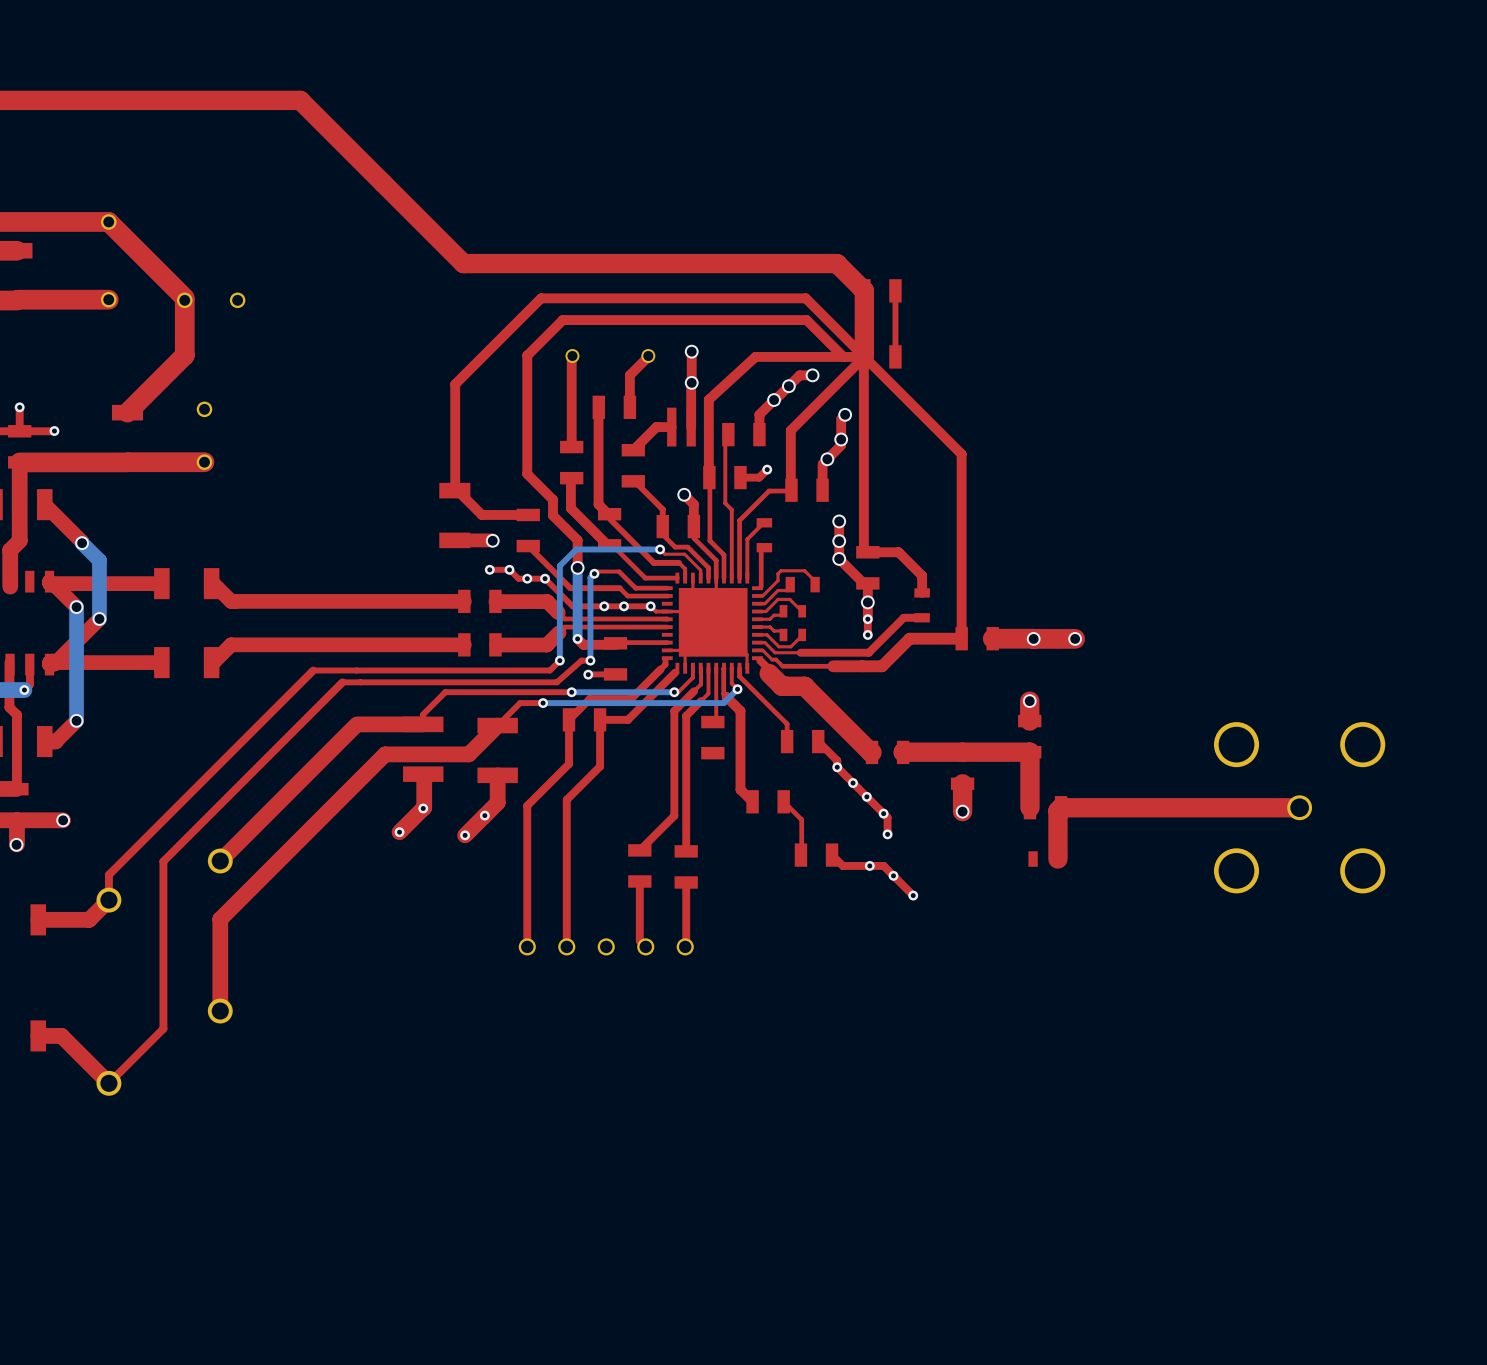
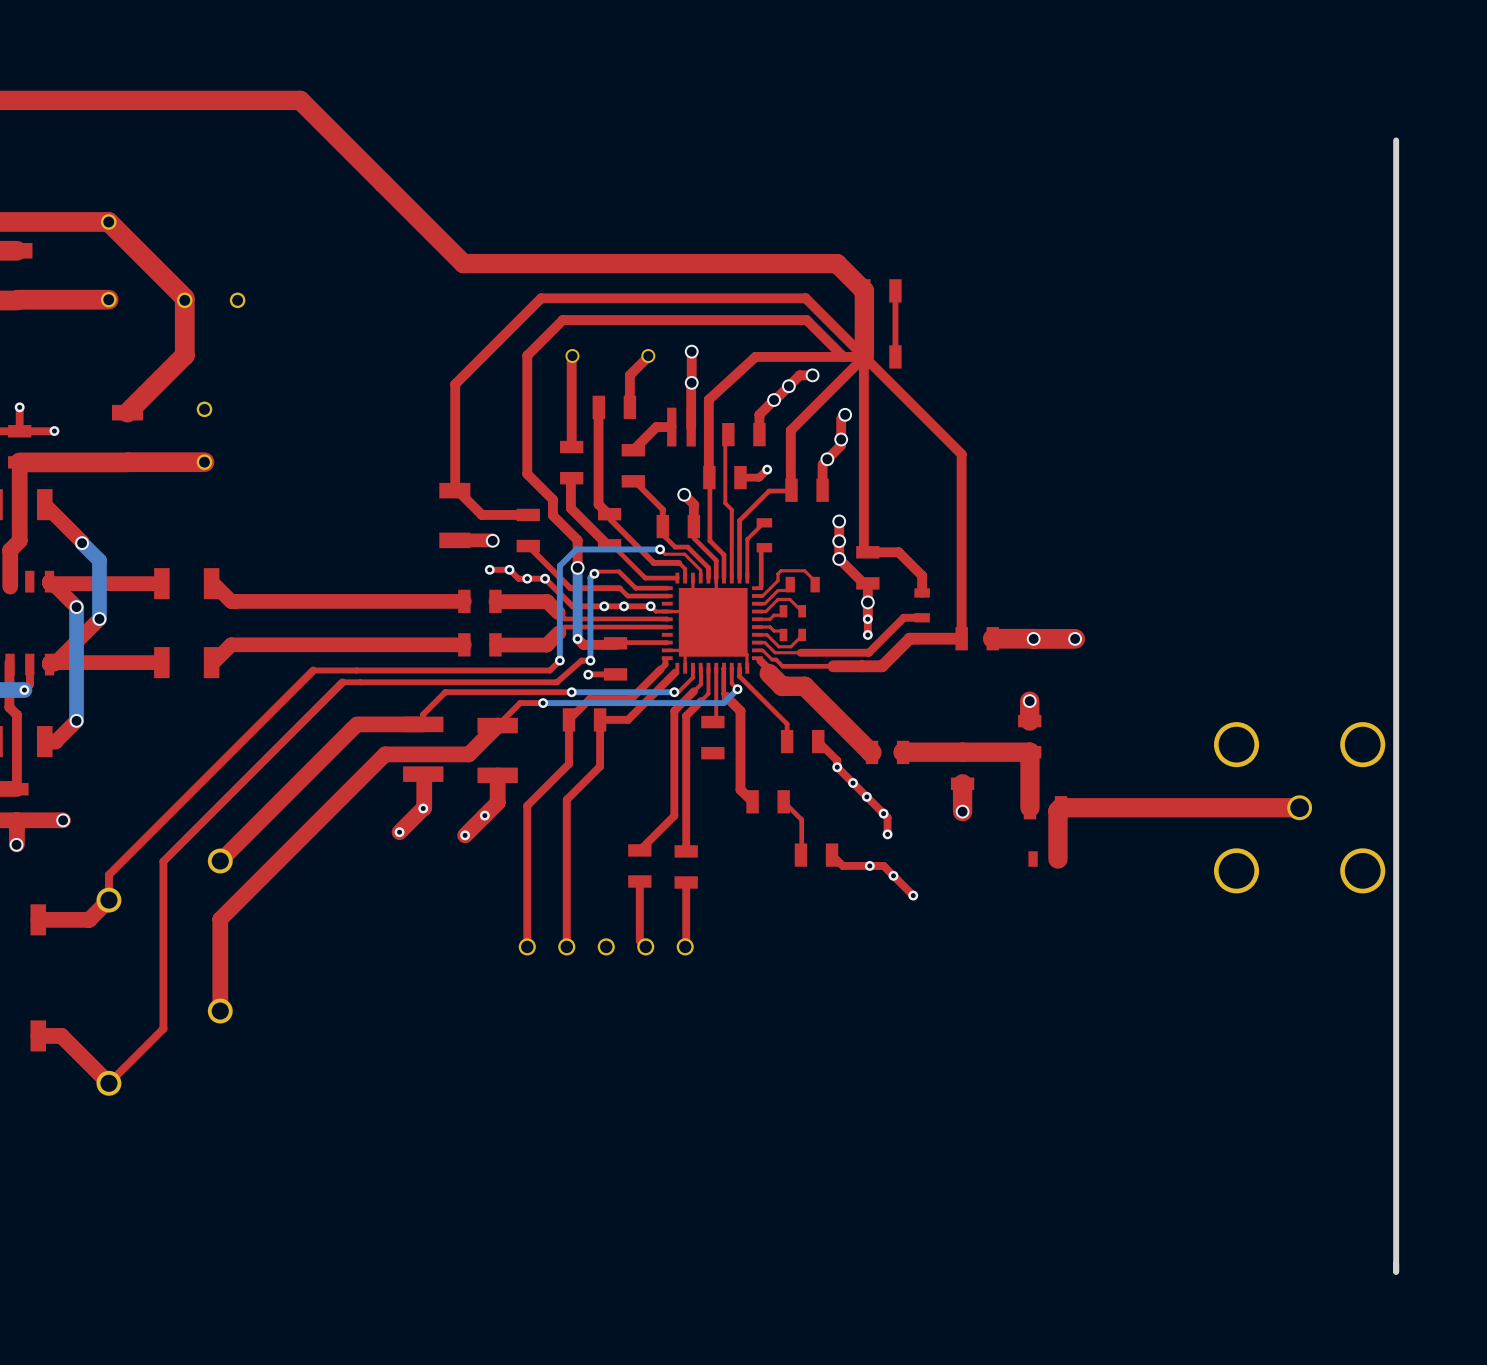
board edge: none -> (1396, 140) (1396, 1271)

